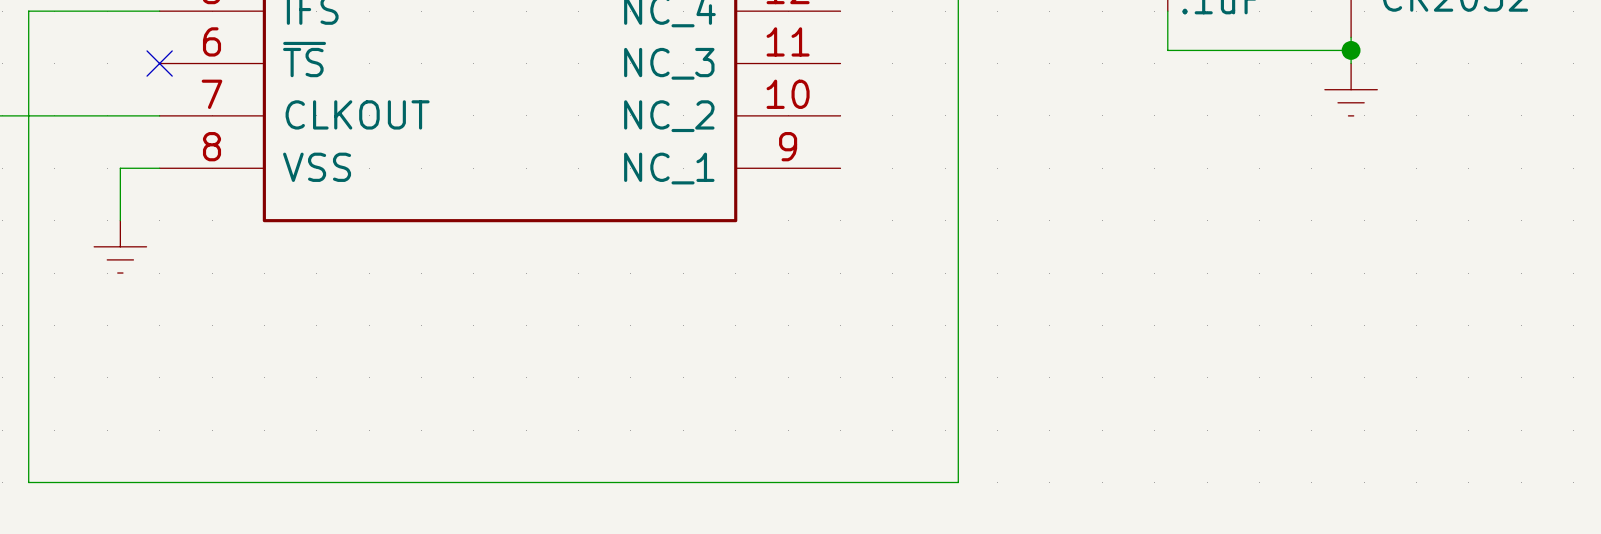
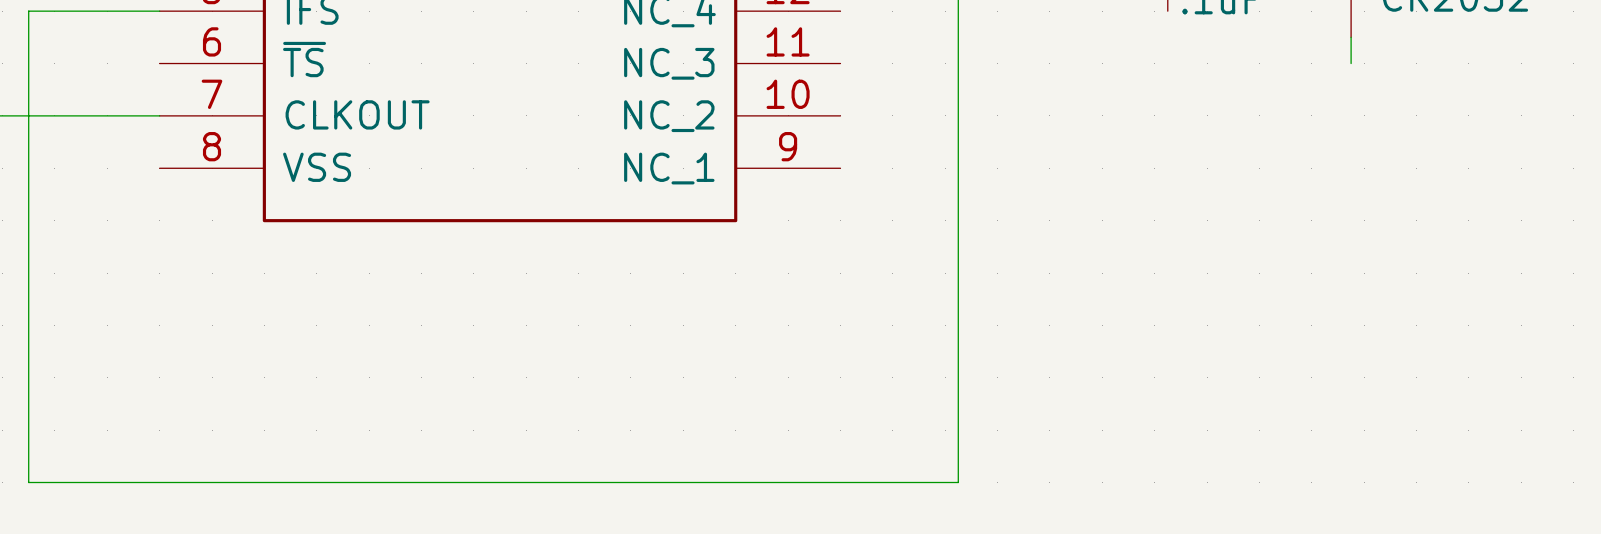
wire: (1167, 11) (1167, 50) (1351, 50) -> none
junction: (1351, 50) -> none
no-connect mark: (159, 63) -> none
power symbol: (1351, 89) -> none
wire: (159, 168) (120, 168) (120, 220) -> none
power symbol: (120, 246) -> none

